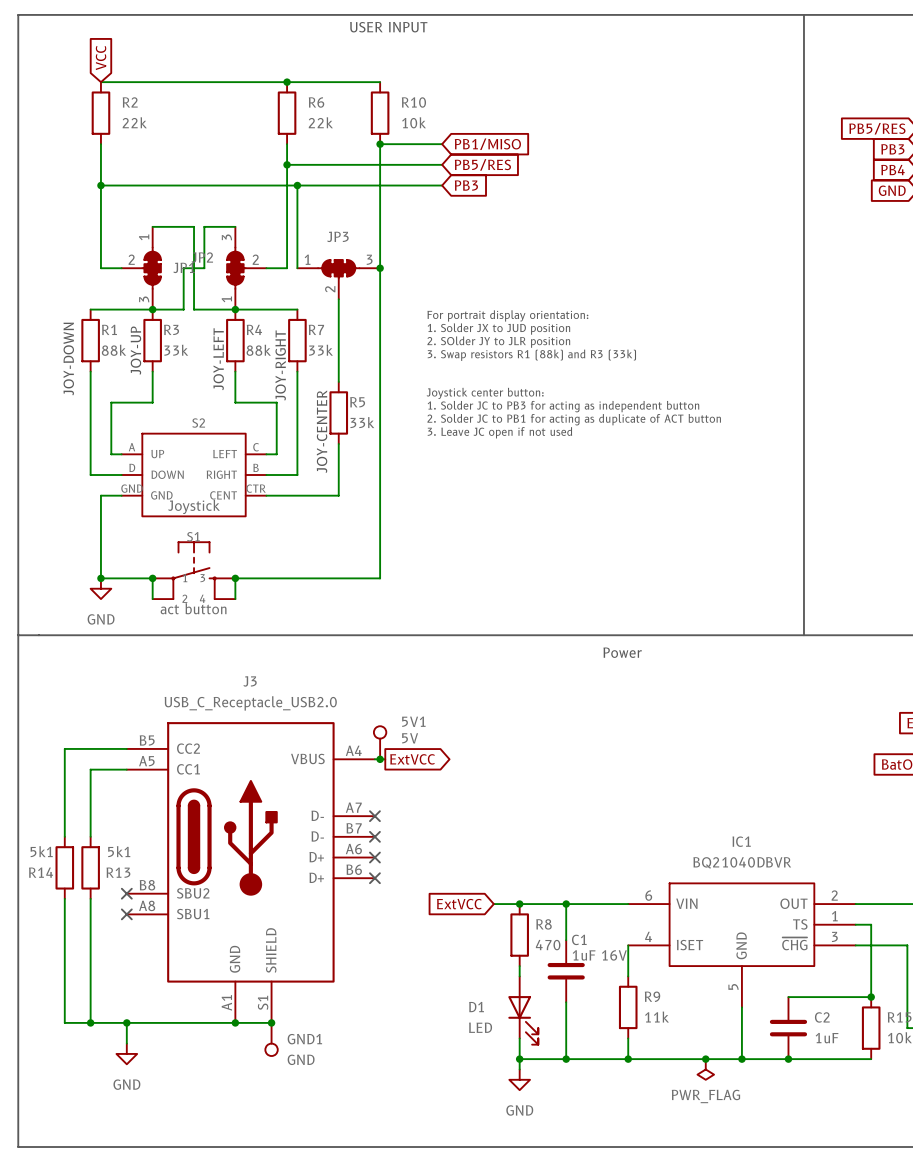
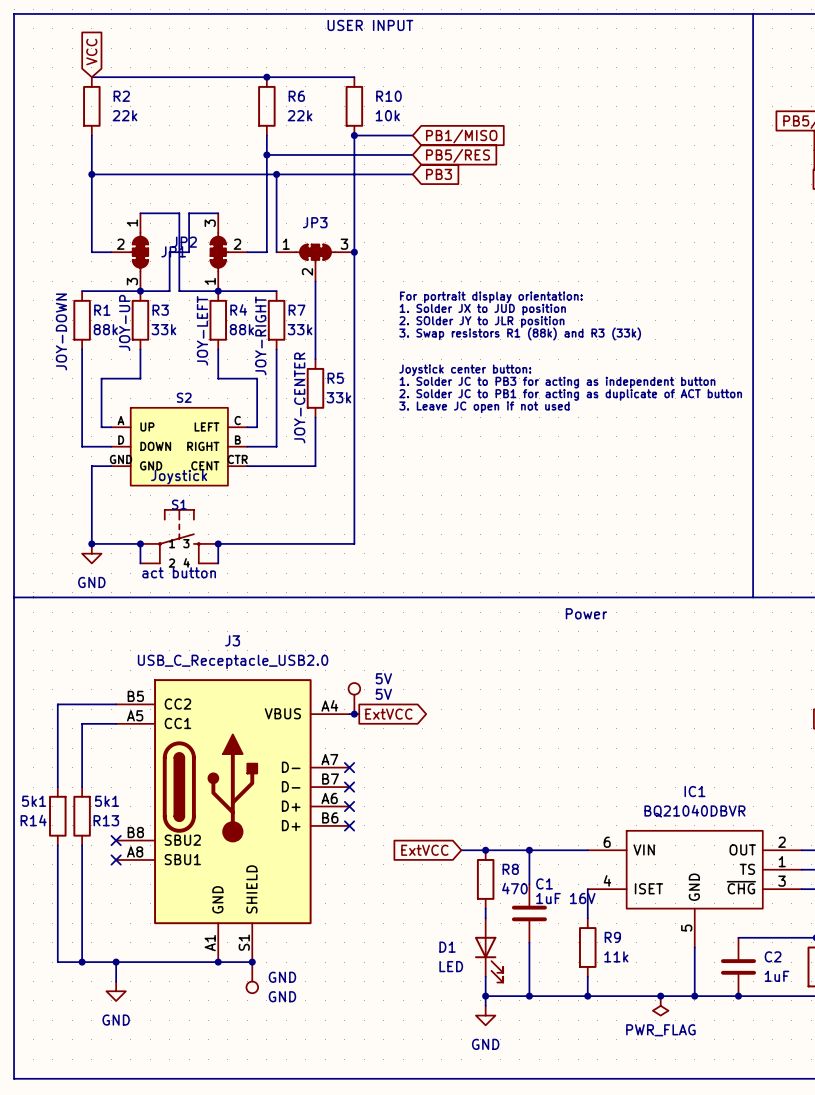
5V1 name: 5V1 (413, 721) -> 5V (383, 678)
GND1 name: GND1 (304, 1039) -> GND (282, 977)

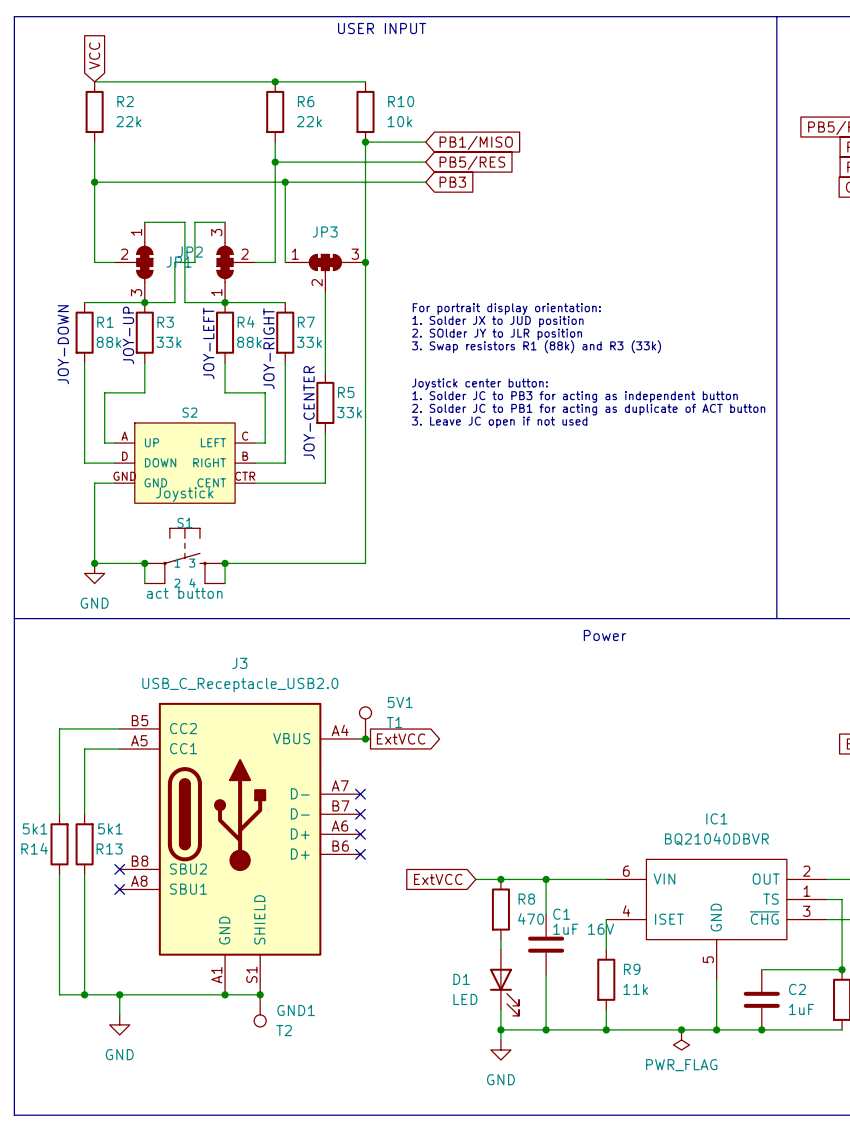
5V name: 5V (383, 678) -> 5V1 (400, 702)
5V value: 5V (383, 694) -> T1 (394, 722)
GND name: GND (282, 977) -> GND1 (296, 1010)
GND value: GND (282, 996) -> T2 (284, 1030)

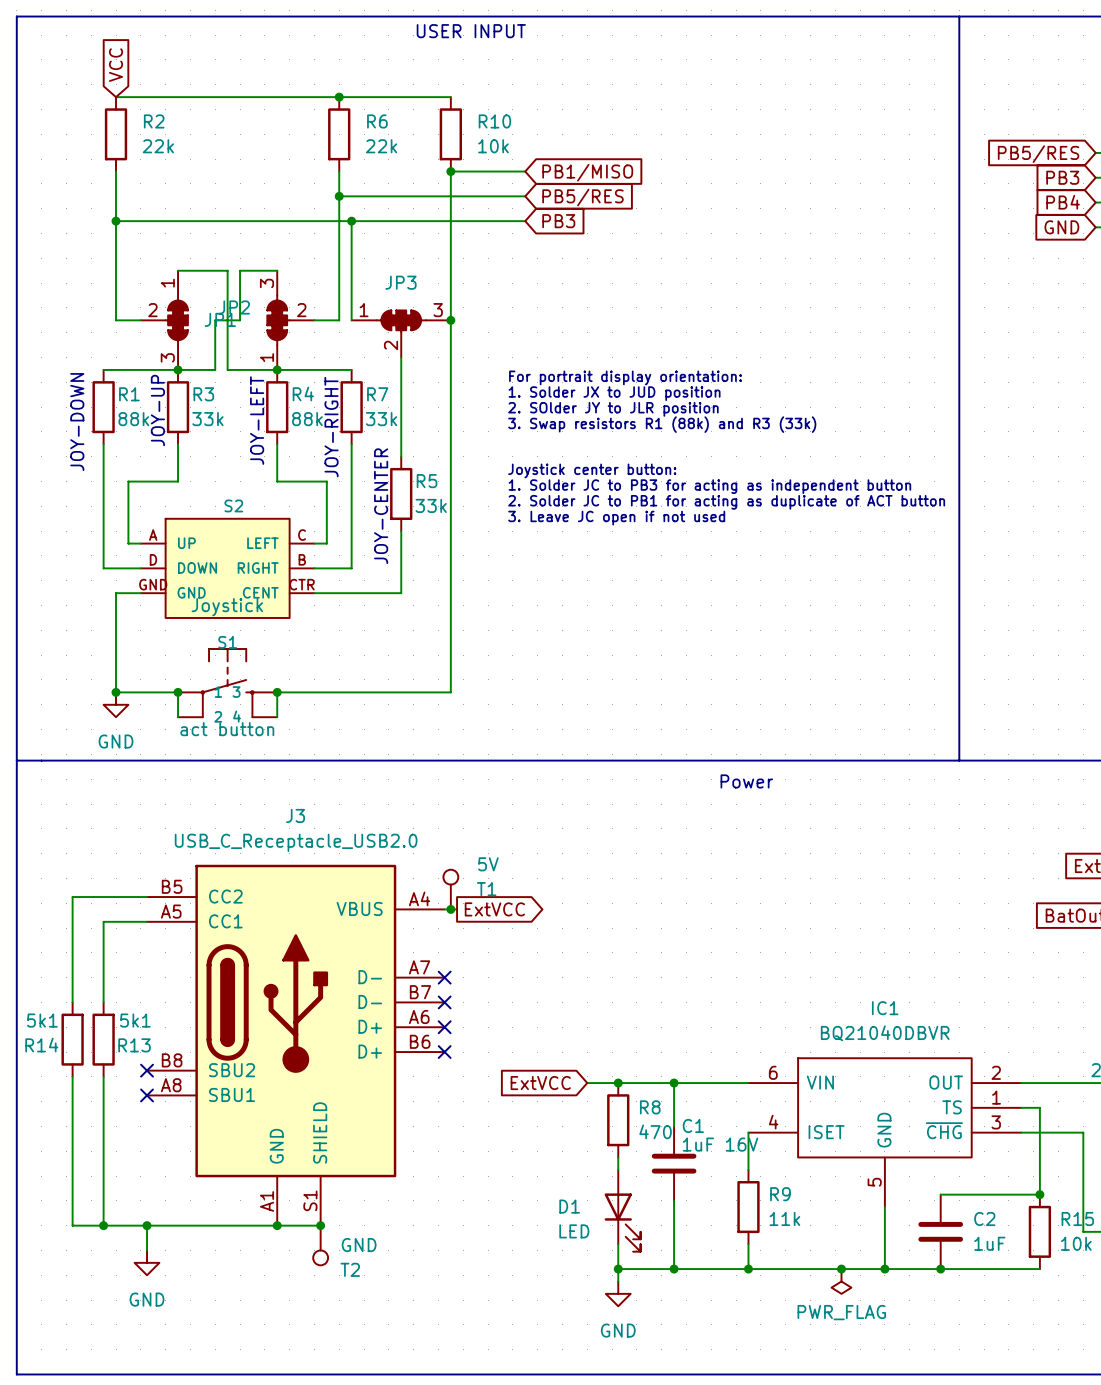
5V1 name: 5V1 (400, 702) -> 5V (488, 864)
GND1 name: GND1 (296, 1010) -> GND (359, 1245)

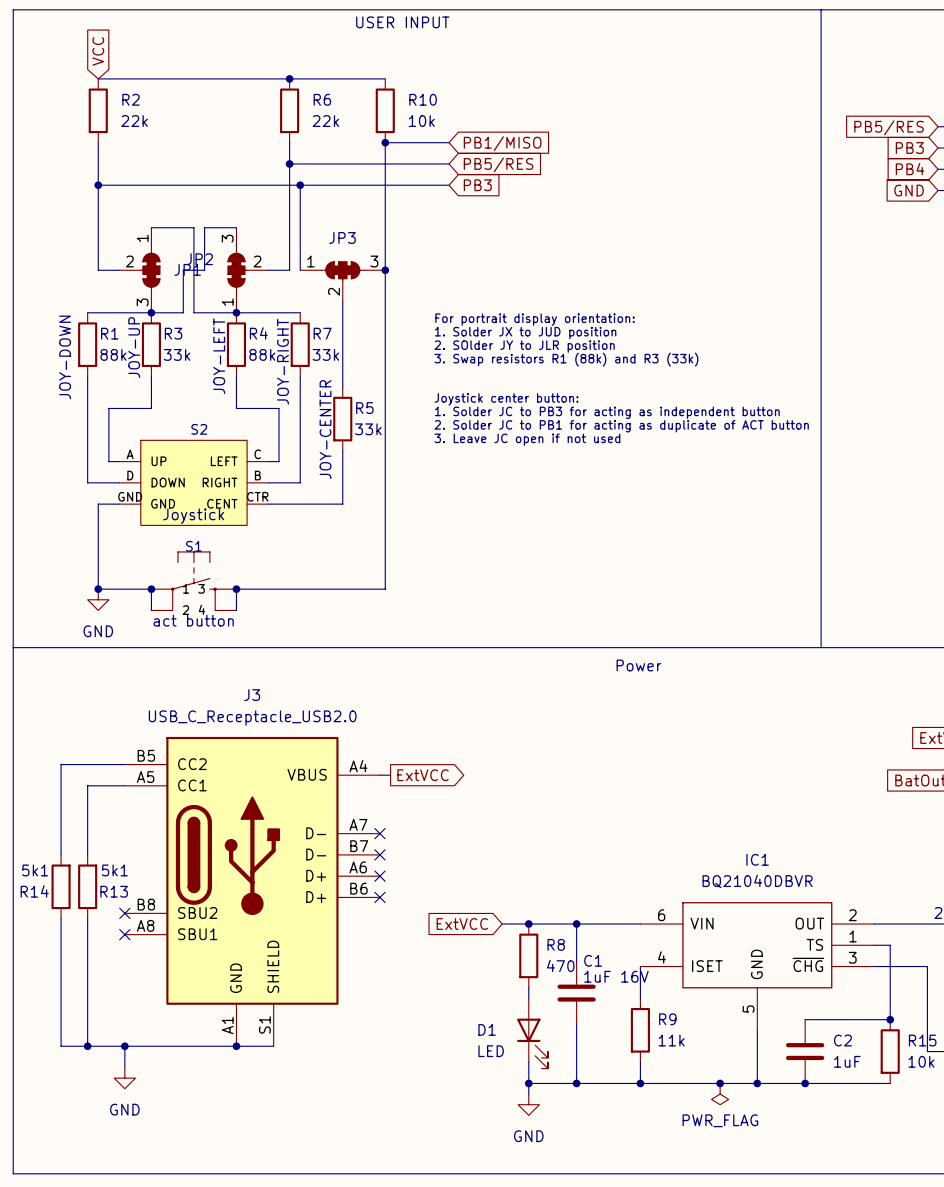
5V: T1 (450, 889) -> none
junction: (450, 909) -> none
junction: (320, 1225) -> none
GND: T2 (320, 1245) -> none

